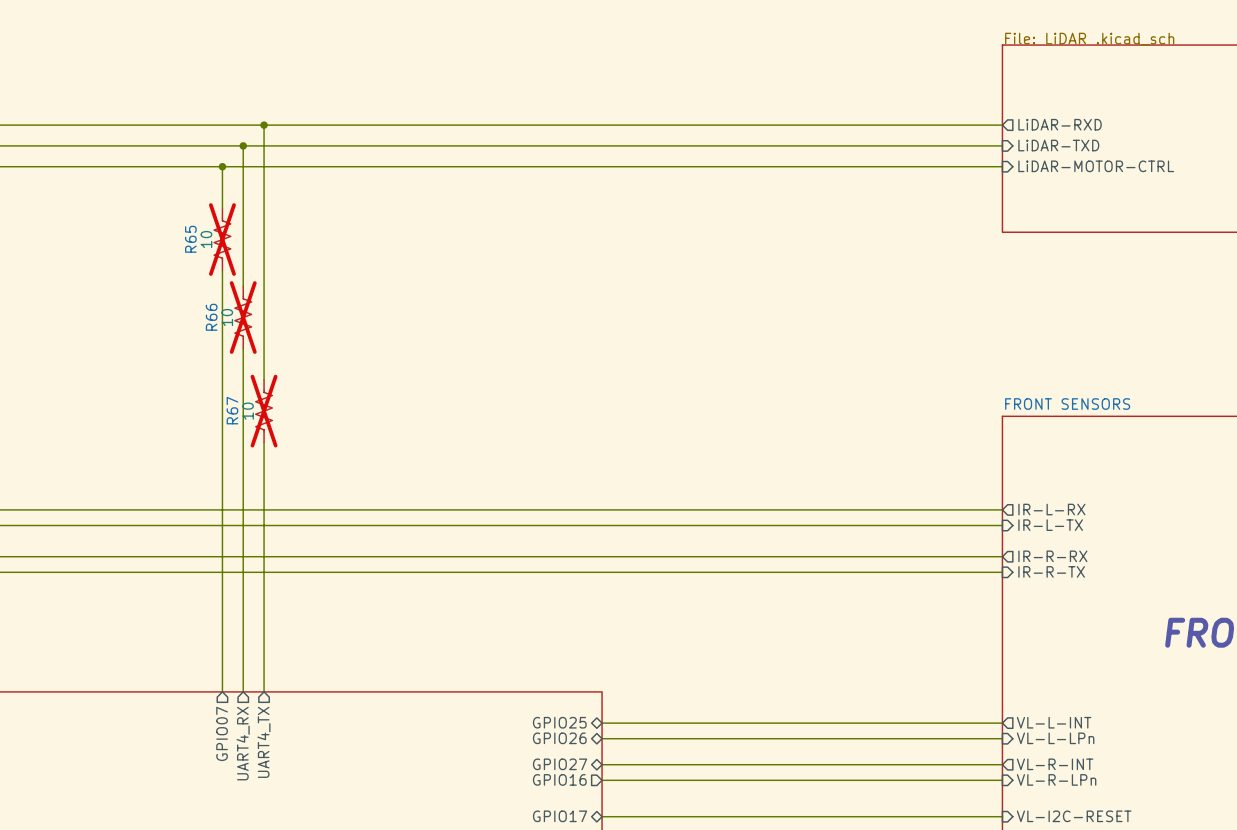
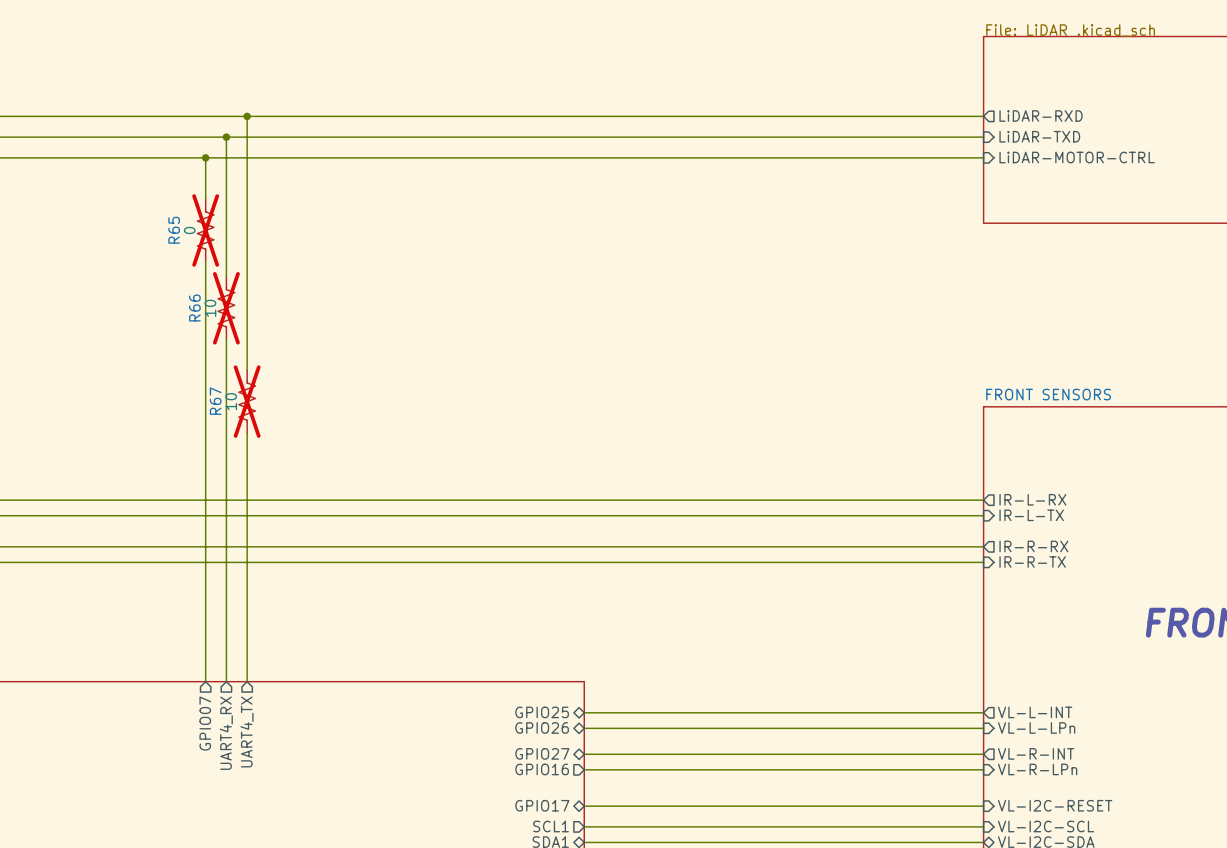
R65 value: 10 (206, 239) -> 0 (189, 230)

